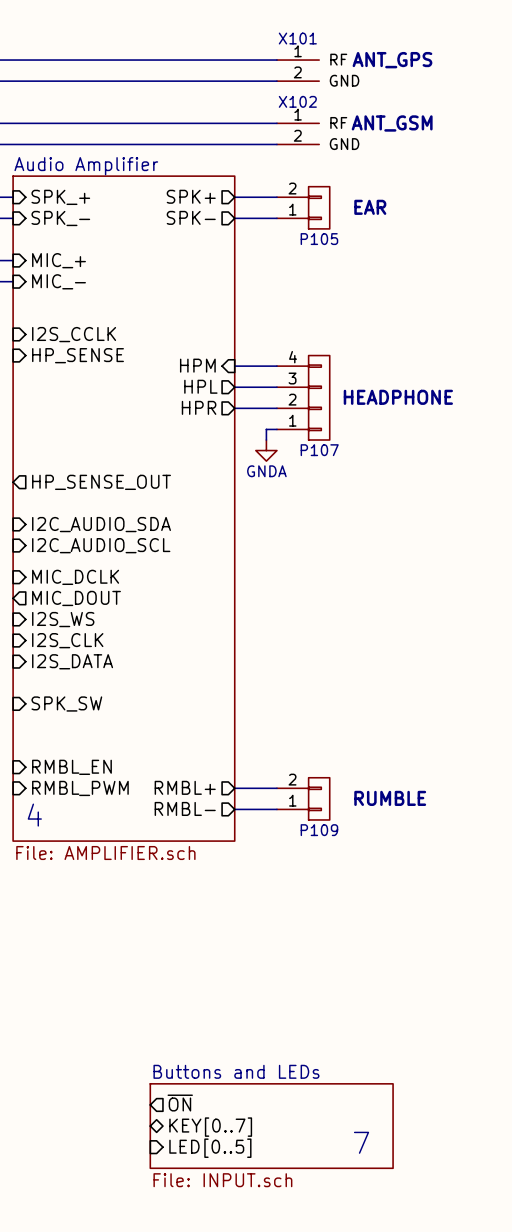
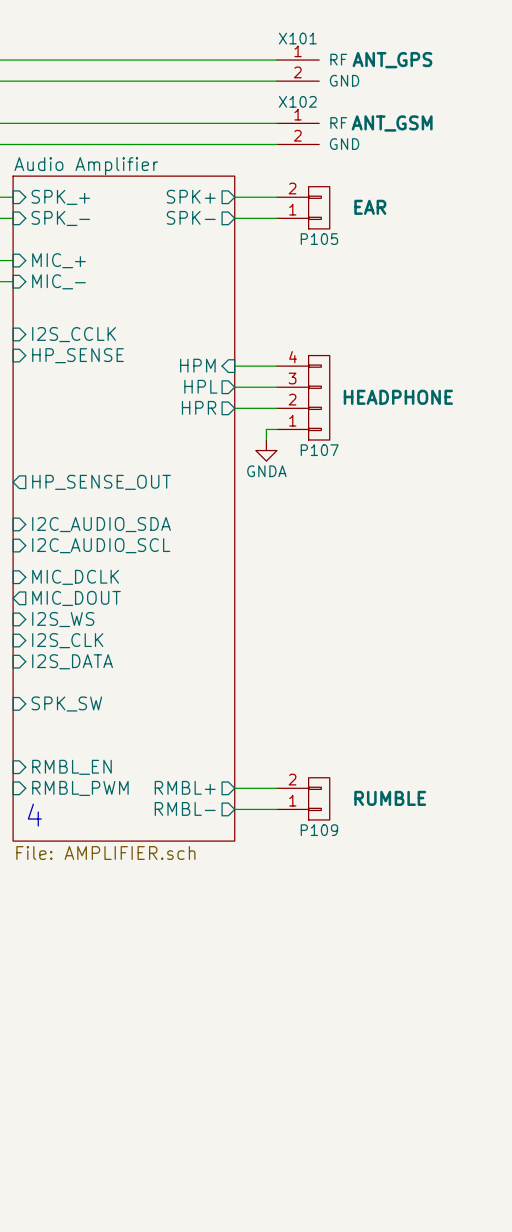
sheet pin: ~{ON} (180, 1103) -> none
sheet Buttons and LEDs: File: INPUT.sch (271, 1126) -> none
sheet pin: KEY[0..7] (210, 1127) -> none
text: 7 (361, 1142) -> none
sheet pin: LED[0..5] (210, 1148) -> none

